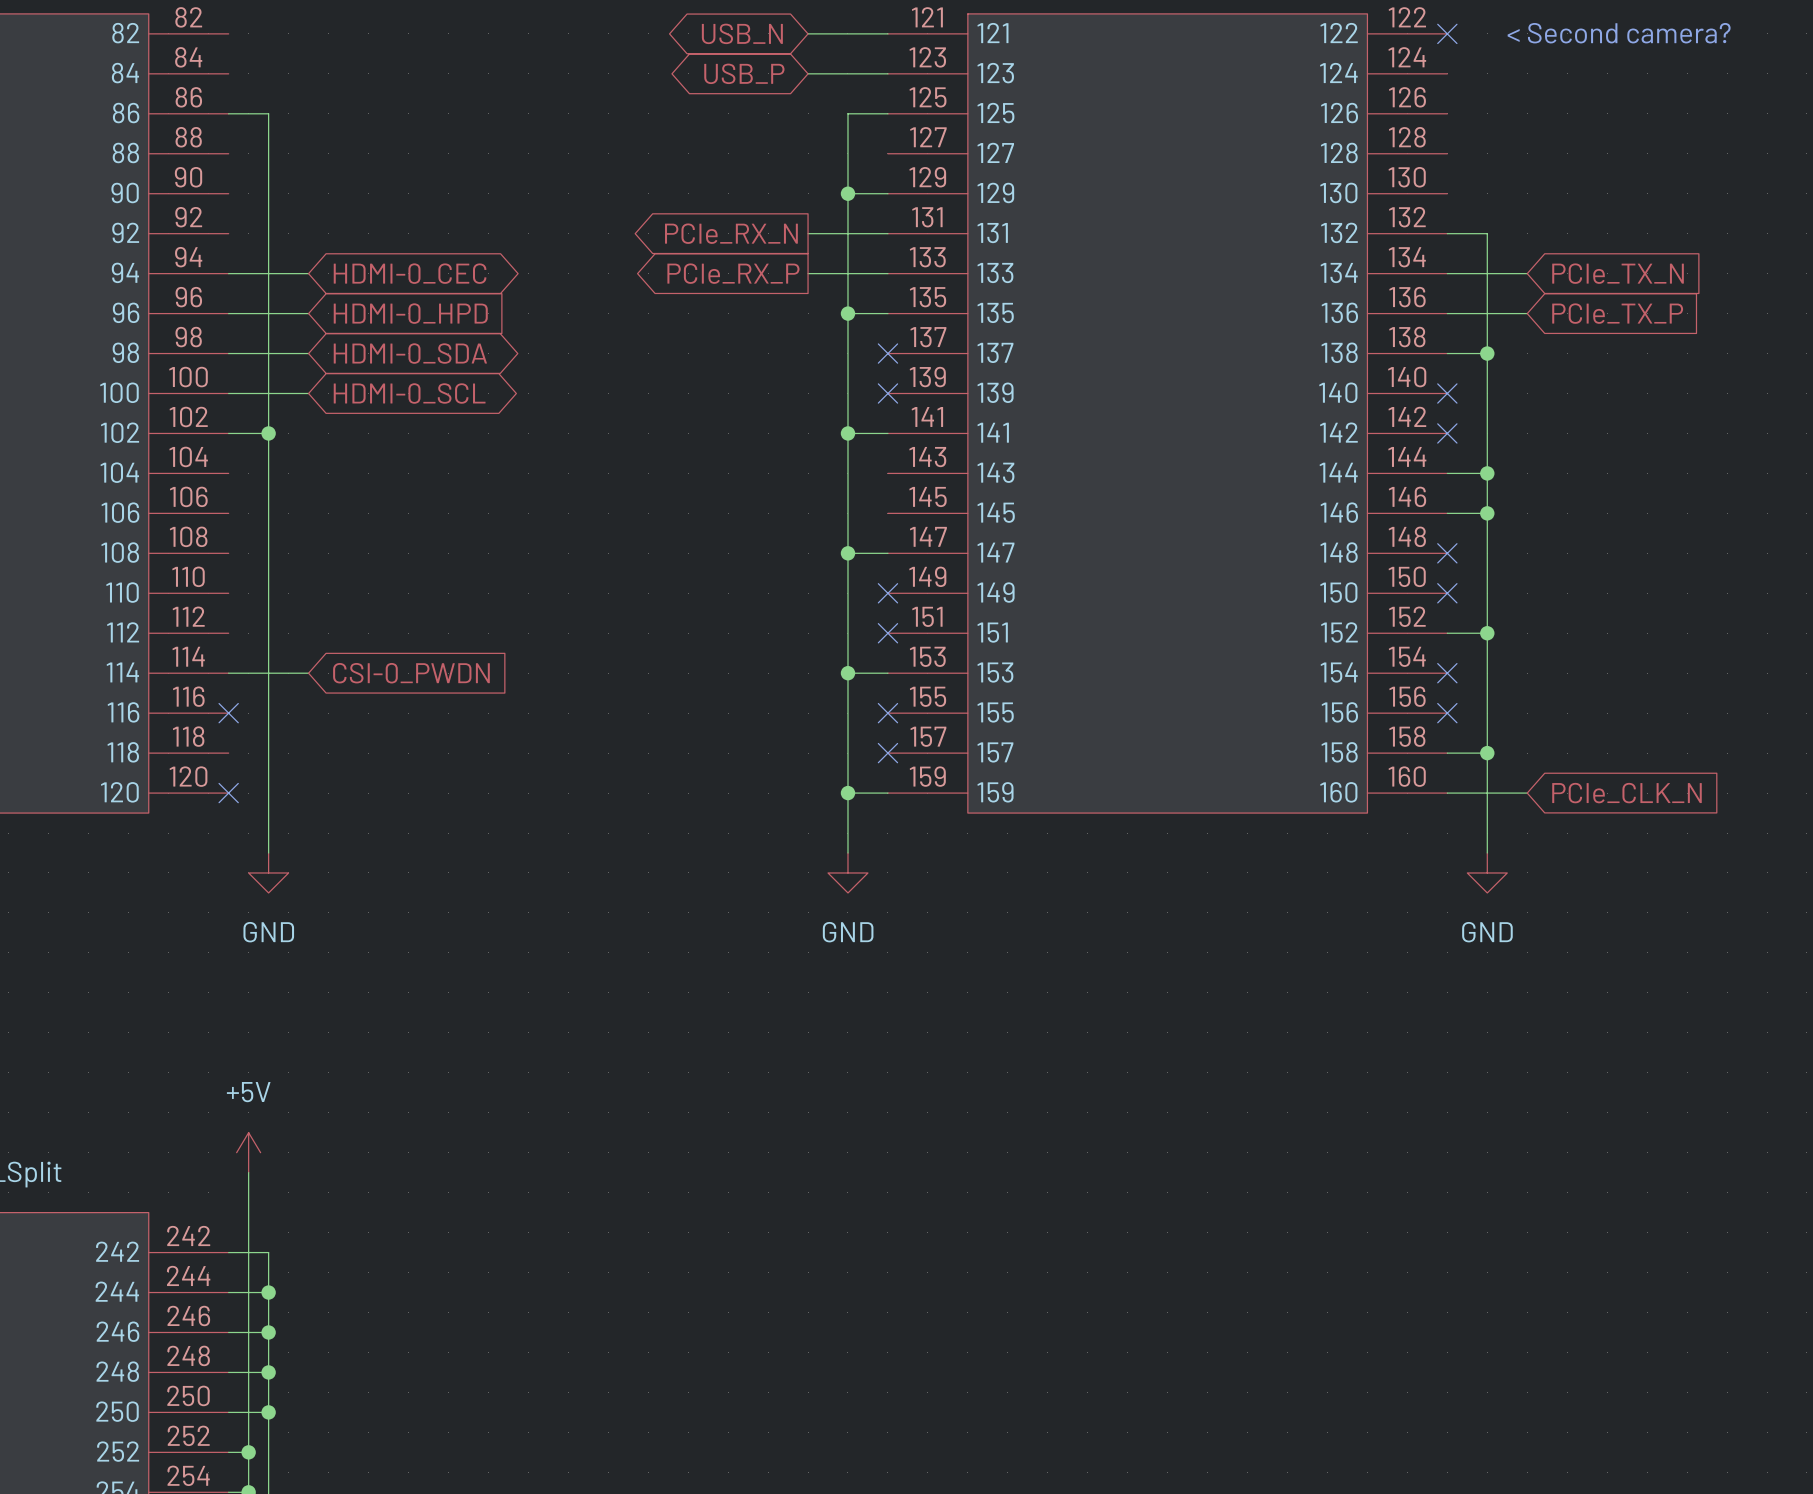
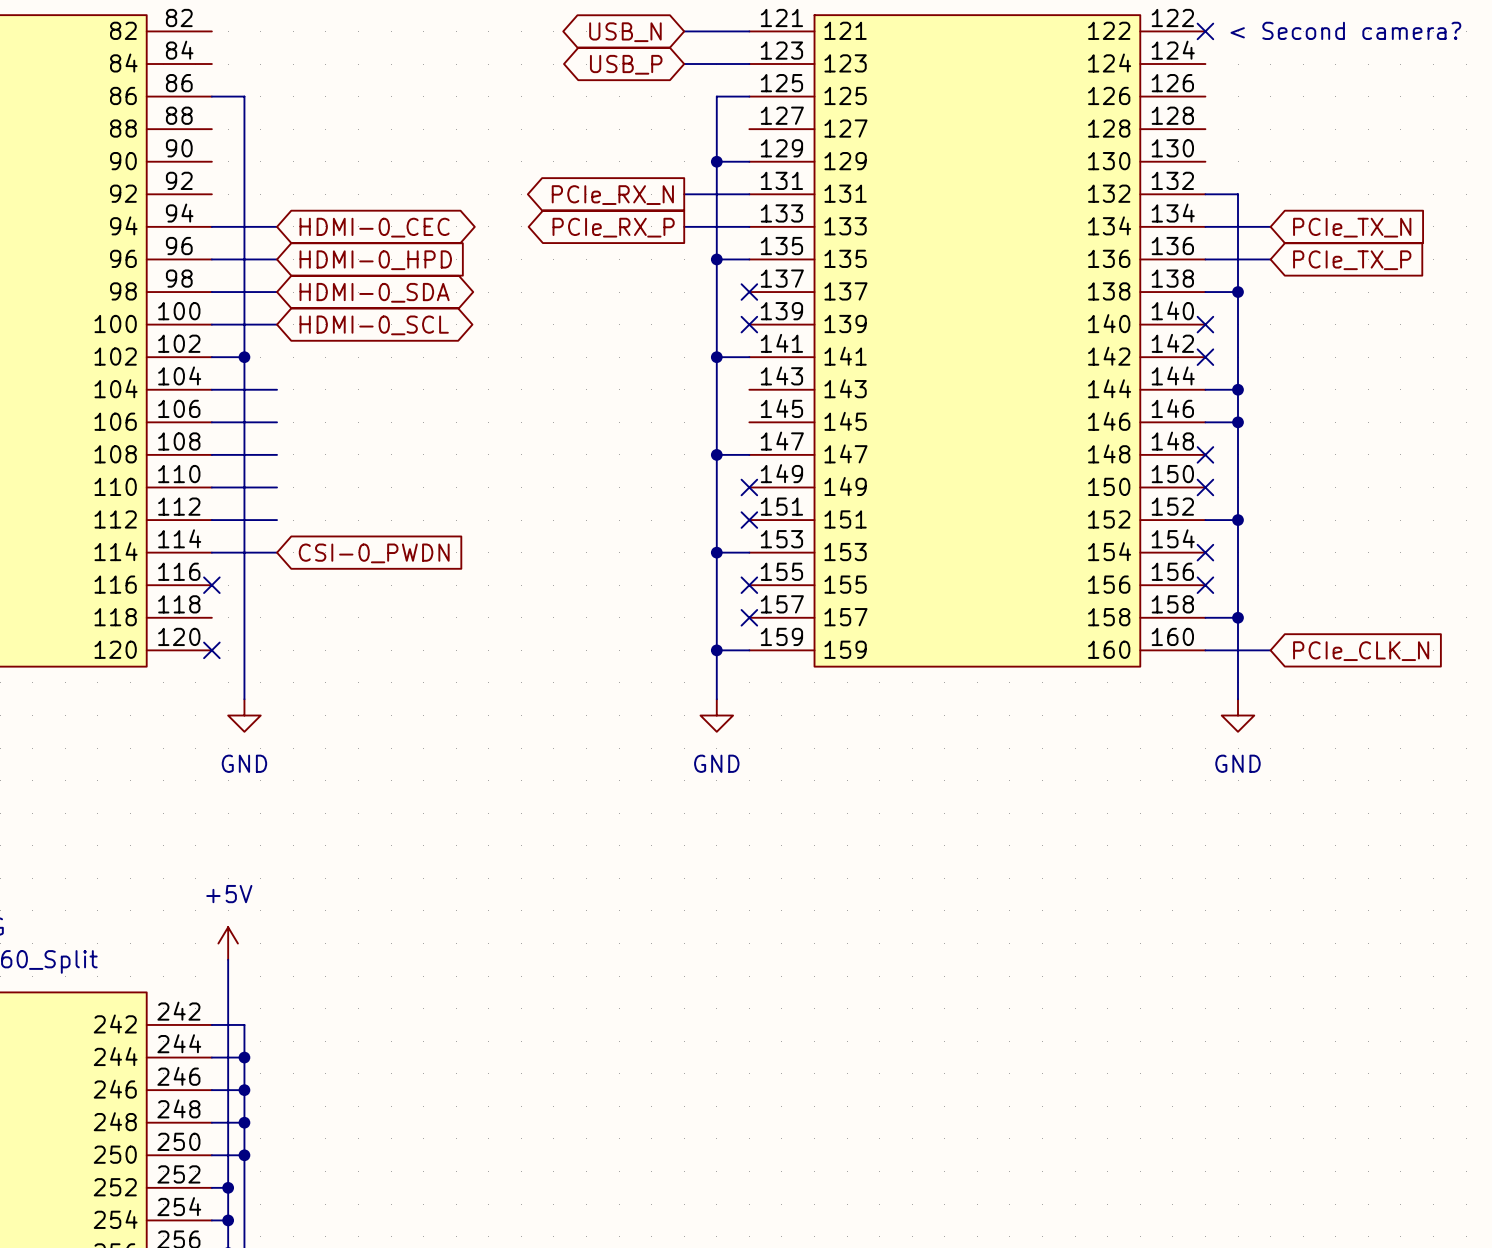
wire: none -> (211, 389) (277, 389)
wire: none -> (211, 422) (277, 422)
wire: none -> (211, 454) (277, 454)
wire: none -> (211, 487) (277, 487)
wire: none -> (211, 520) (277, 520)

